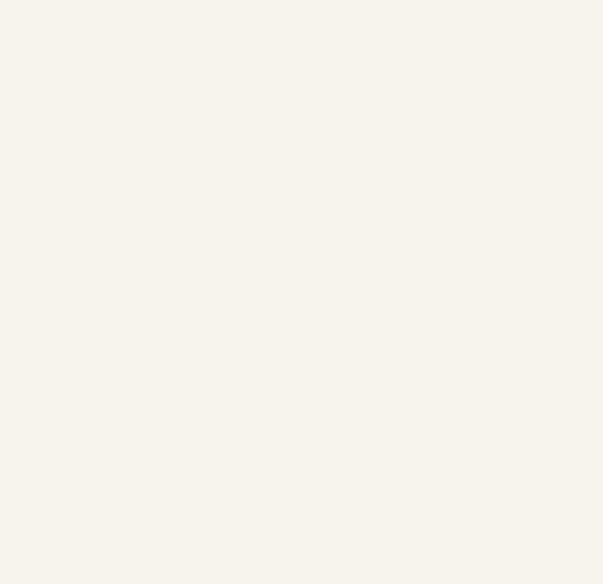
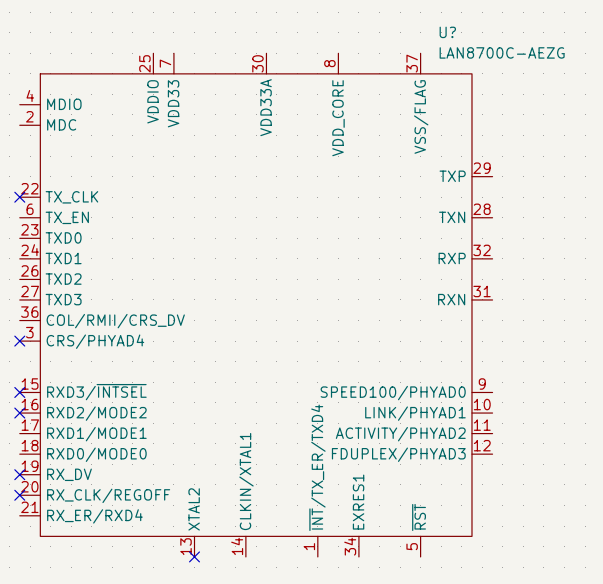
no-connect mark: none -> (19, 197)
U?: none -> LAN8700C-AEZG (256, 305)
no-connect mark: none -> (19, 341)
no-connect mark: none -> (19, 392)
no-connect mark: none -> (19, 413)
no-connect mark: none -> (19, 474)
no-connect mark: none -> (19, 495)
no-connect mark: none -> (194, 556)

